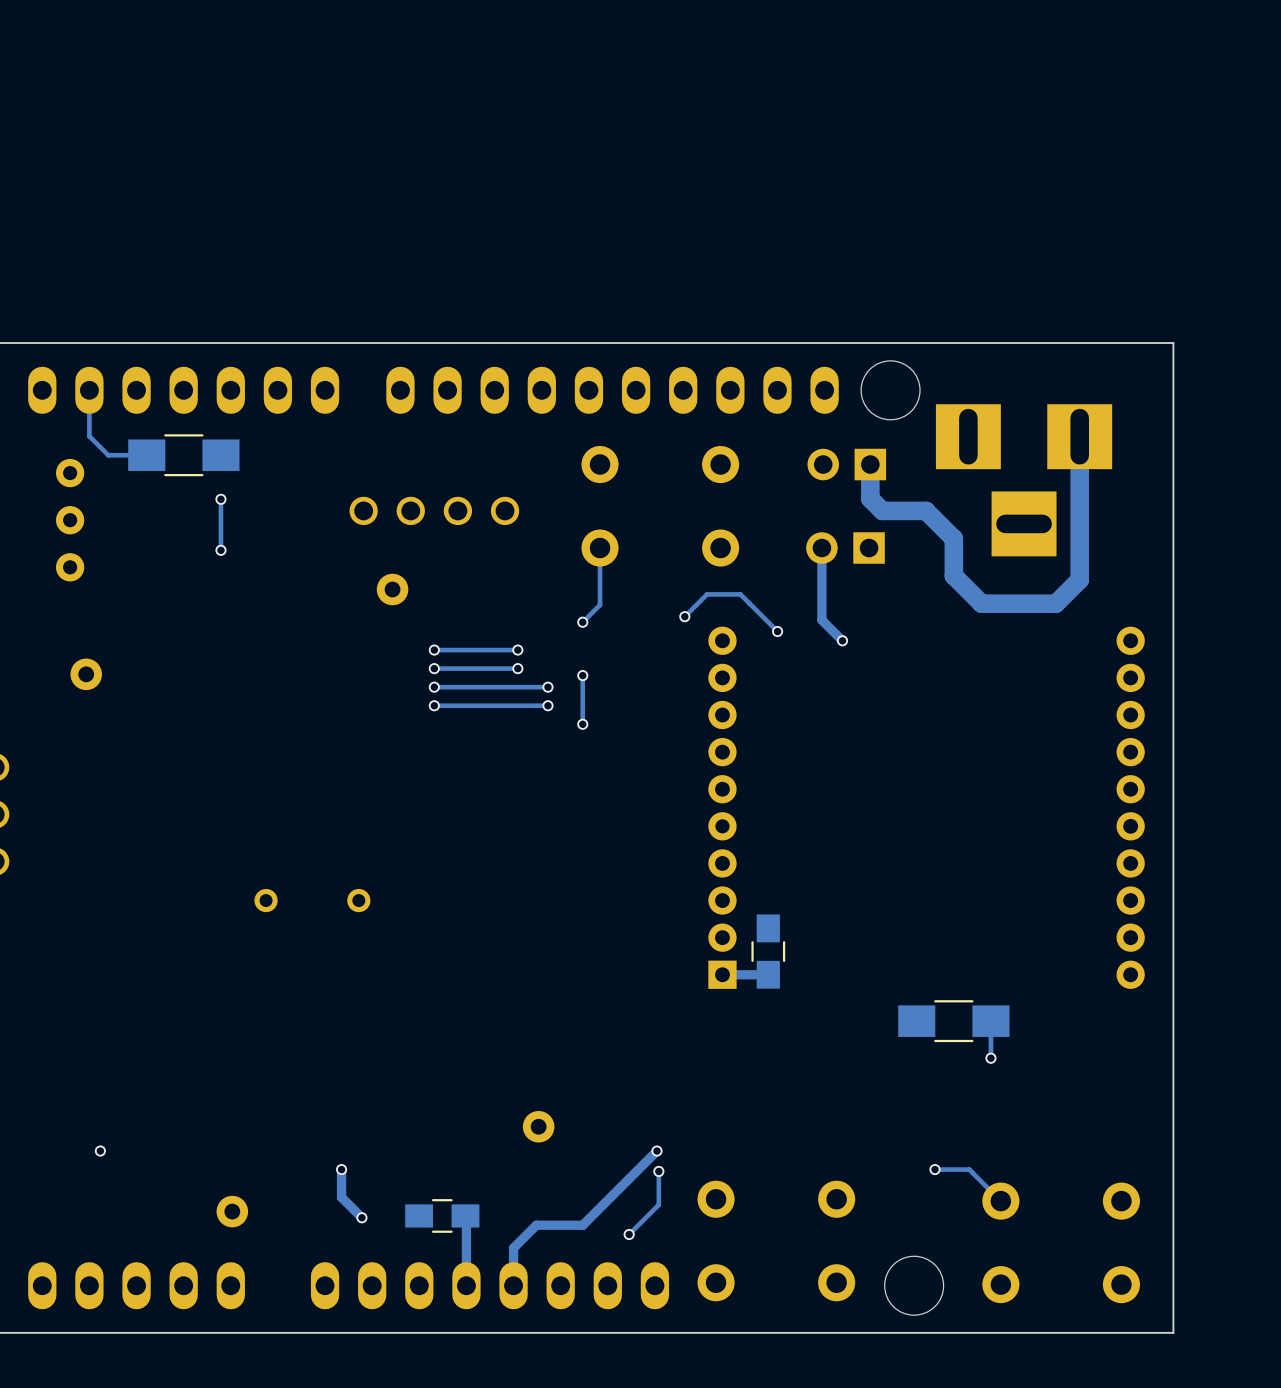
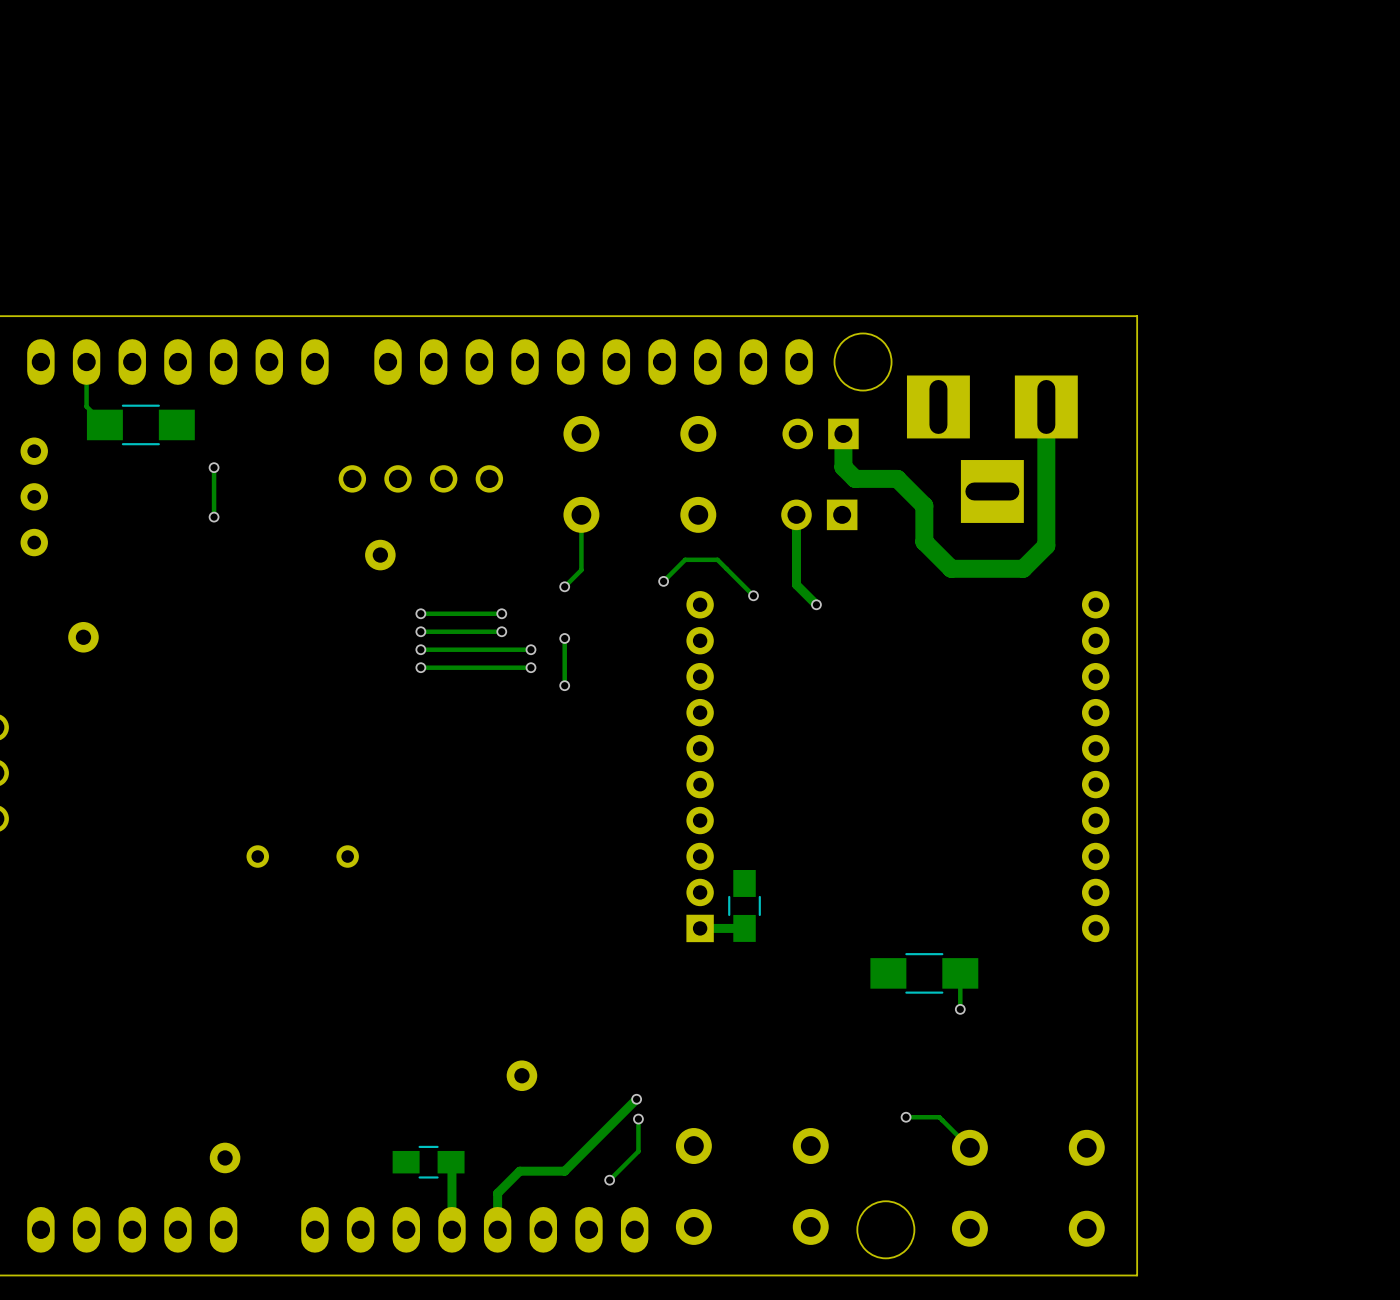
track: (146, 455) (108, 455) -> none
part position: (183, 455) -> (140, 424)
part position: (70, 520) -> (34, 496)
via: (100, 1151) -> none
track: (341, 1169) (341, 1197) (361, 1217) -> none
via: (341, 1169) -> none
via: (361, 1217) -> none

